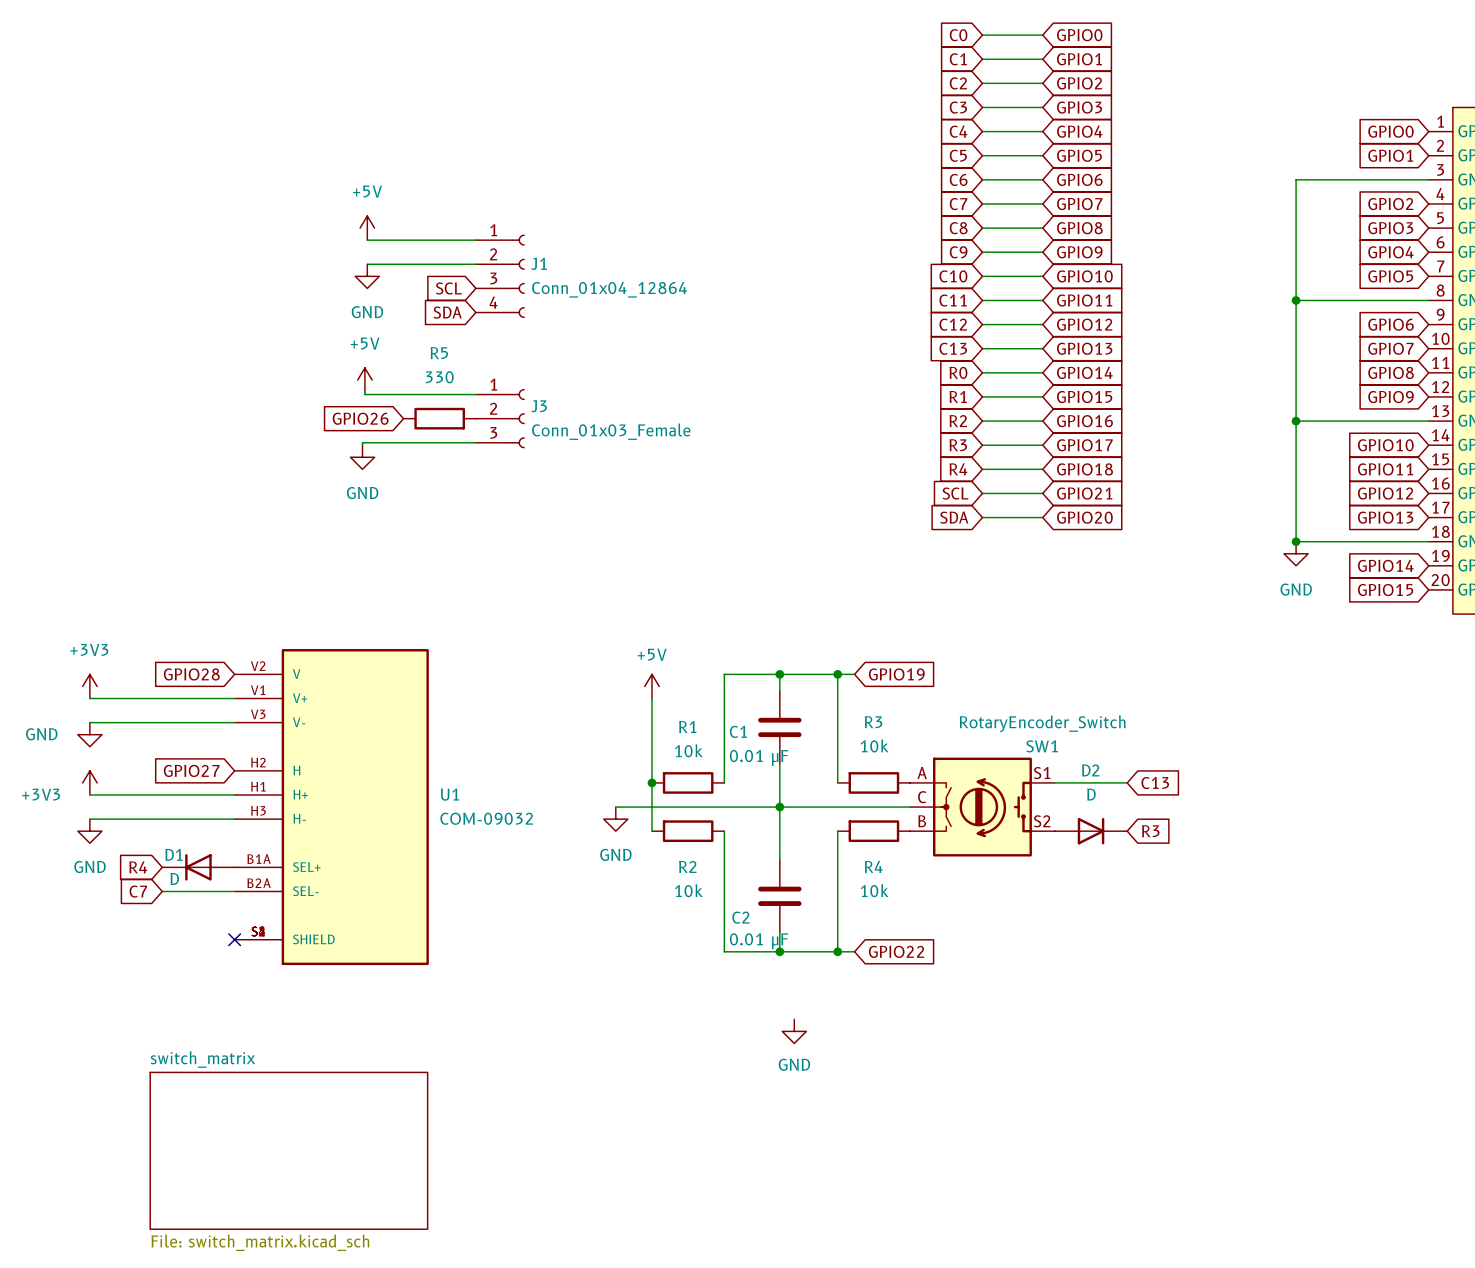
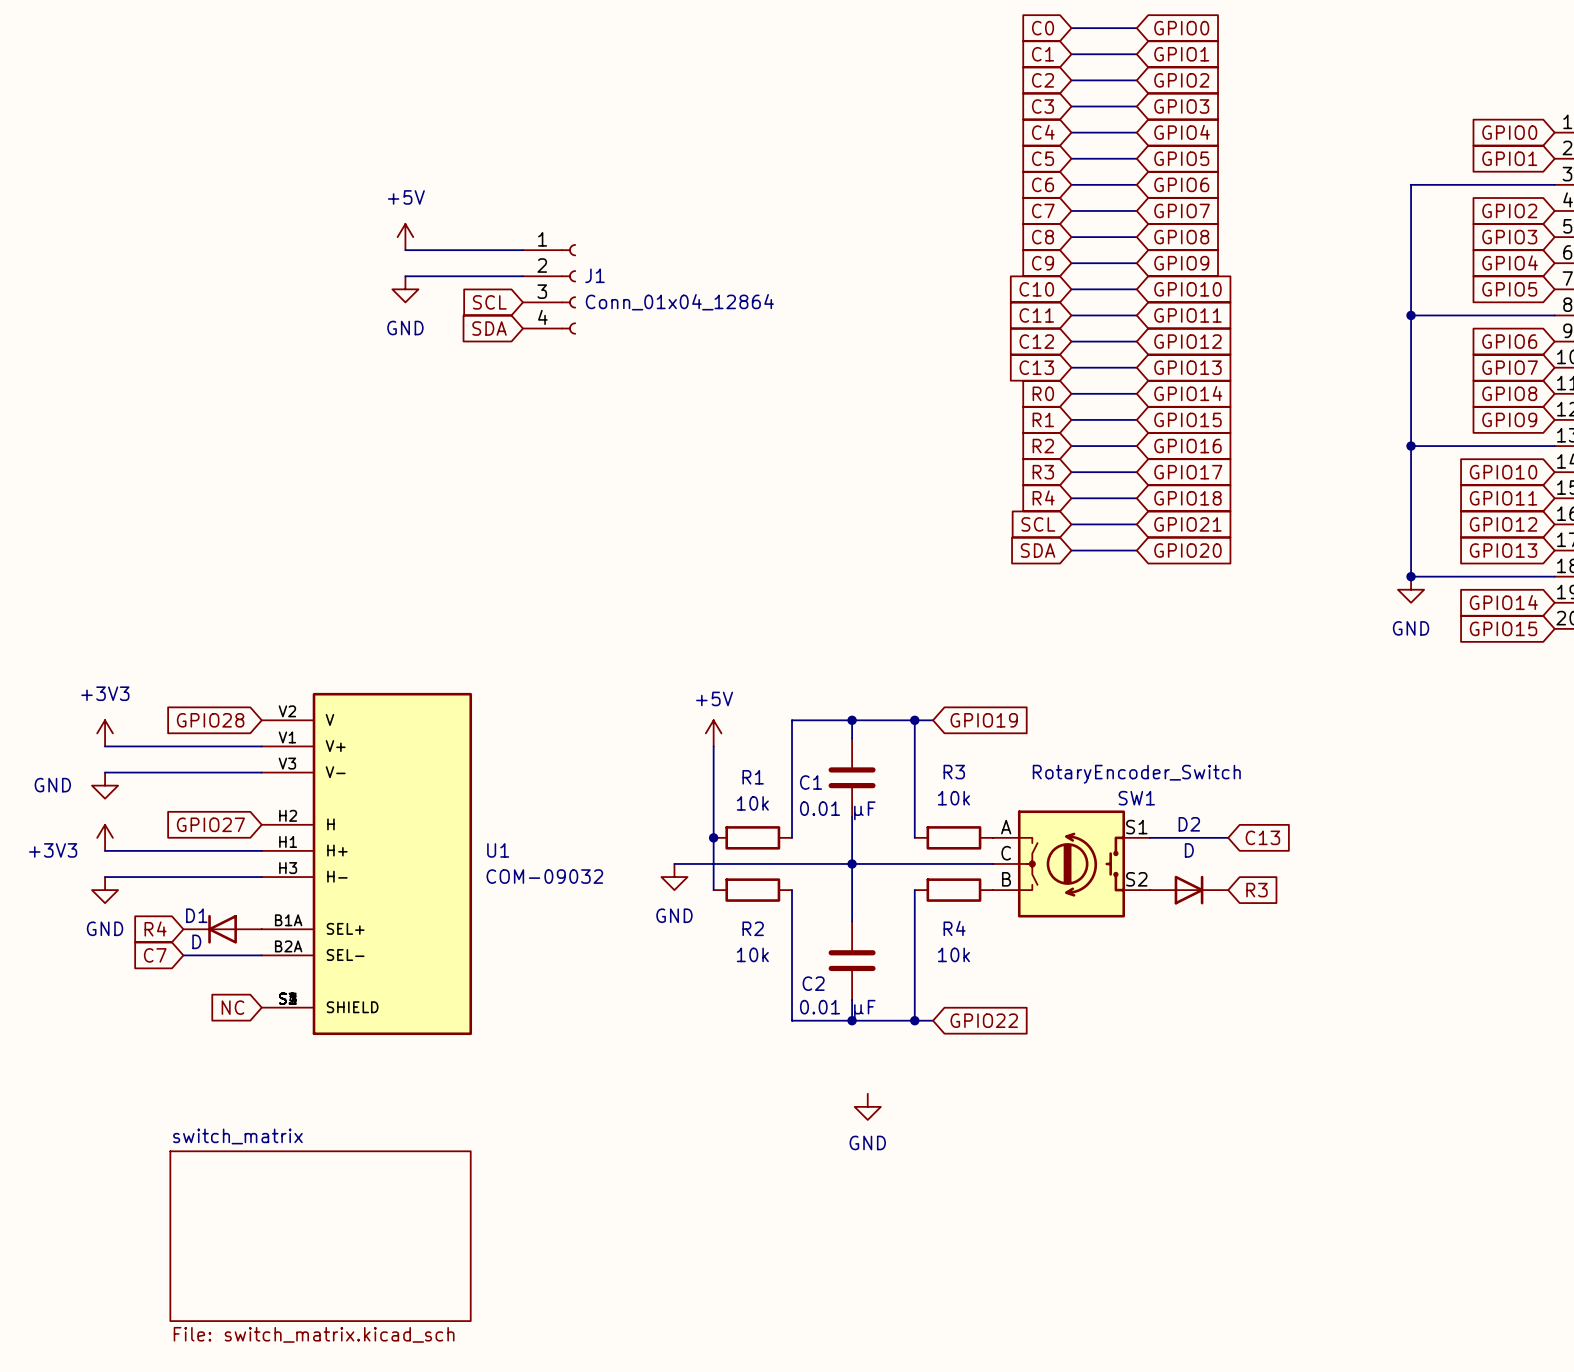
power symbol: +5V (364, 380) -> none
wire: (364, 392) (364, 394) (475, 394) -> none
global label: GPIO26 (360, 418) -> none
R5: 330 (439, 418) -> none
J3: Conn_01x03_Female (500, 418) -> none
wire: (475, 442) (362, 442) (362, 445) -> none
power symbol: GND (362, 457) -> none
global label: none -> NC (232, 1007)
no-connect mark: (234, 939) -> none

